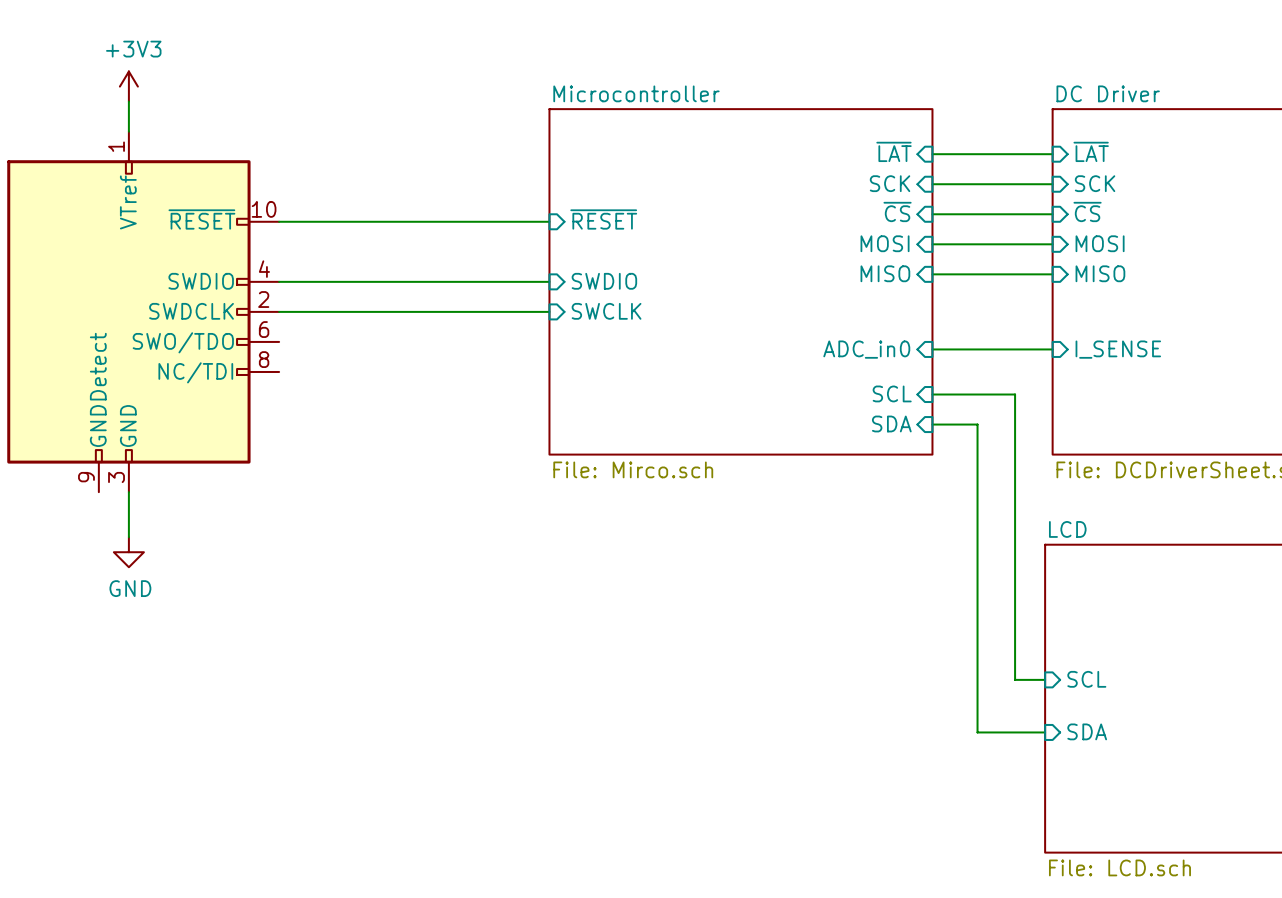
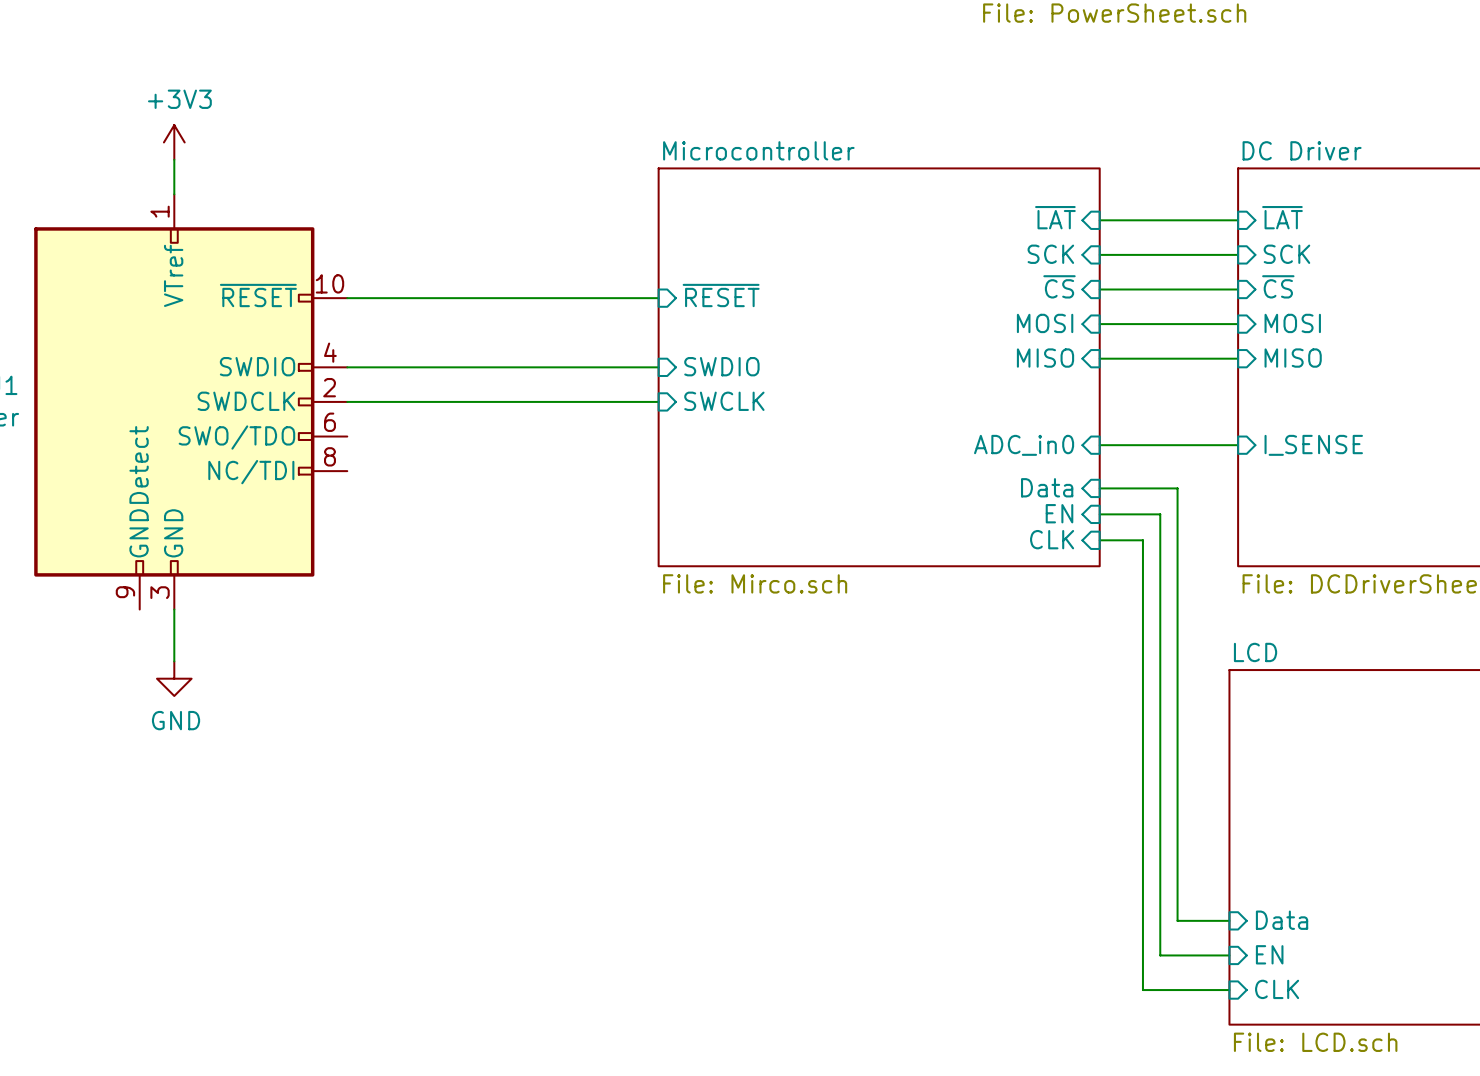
sheet pin: none -> Data (1047, 487)
wire: none -> (1099, 488) (1177, 488) (1177, 920) (1229, 920)
sheet pin: SCL (892, 393) -> none
wire: (932, 394) (1015, 394) (1015, 679) (1045, 679) -> none
sheet pin: none -> EN (1059, 513)
wire: none -> (1099, 514) (1160, 514) (1160, 955) (1229, 955)
sheet pin: SDA (891, 423) -> none
wire: (932, 424) (977, 424) (977, 732) (1045, 732) -> none
sheet pin: none -> CLK (1052, 539)
wire: none -> (1099, 540) (1142, 540) (1142, 990) (1229, 990)
sheet pin: SCL (1086, 679) -> none
sheet pin: SDA (1087, 731) -> none
sheet pin: none -> Data (1282, 920)
sheet pin: none -> EN (1269, 954)
sheet pin: none -> CLK (1277, 989)

